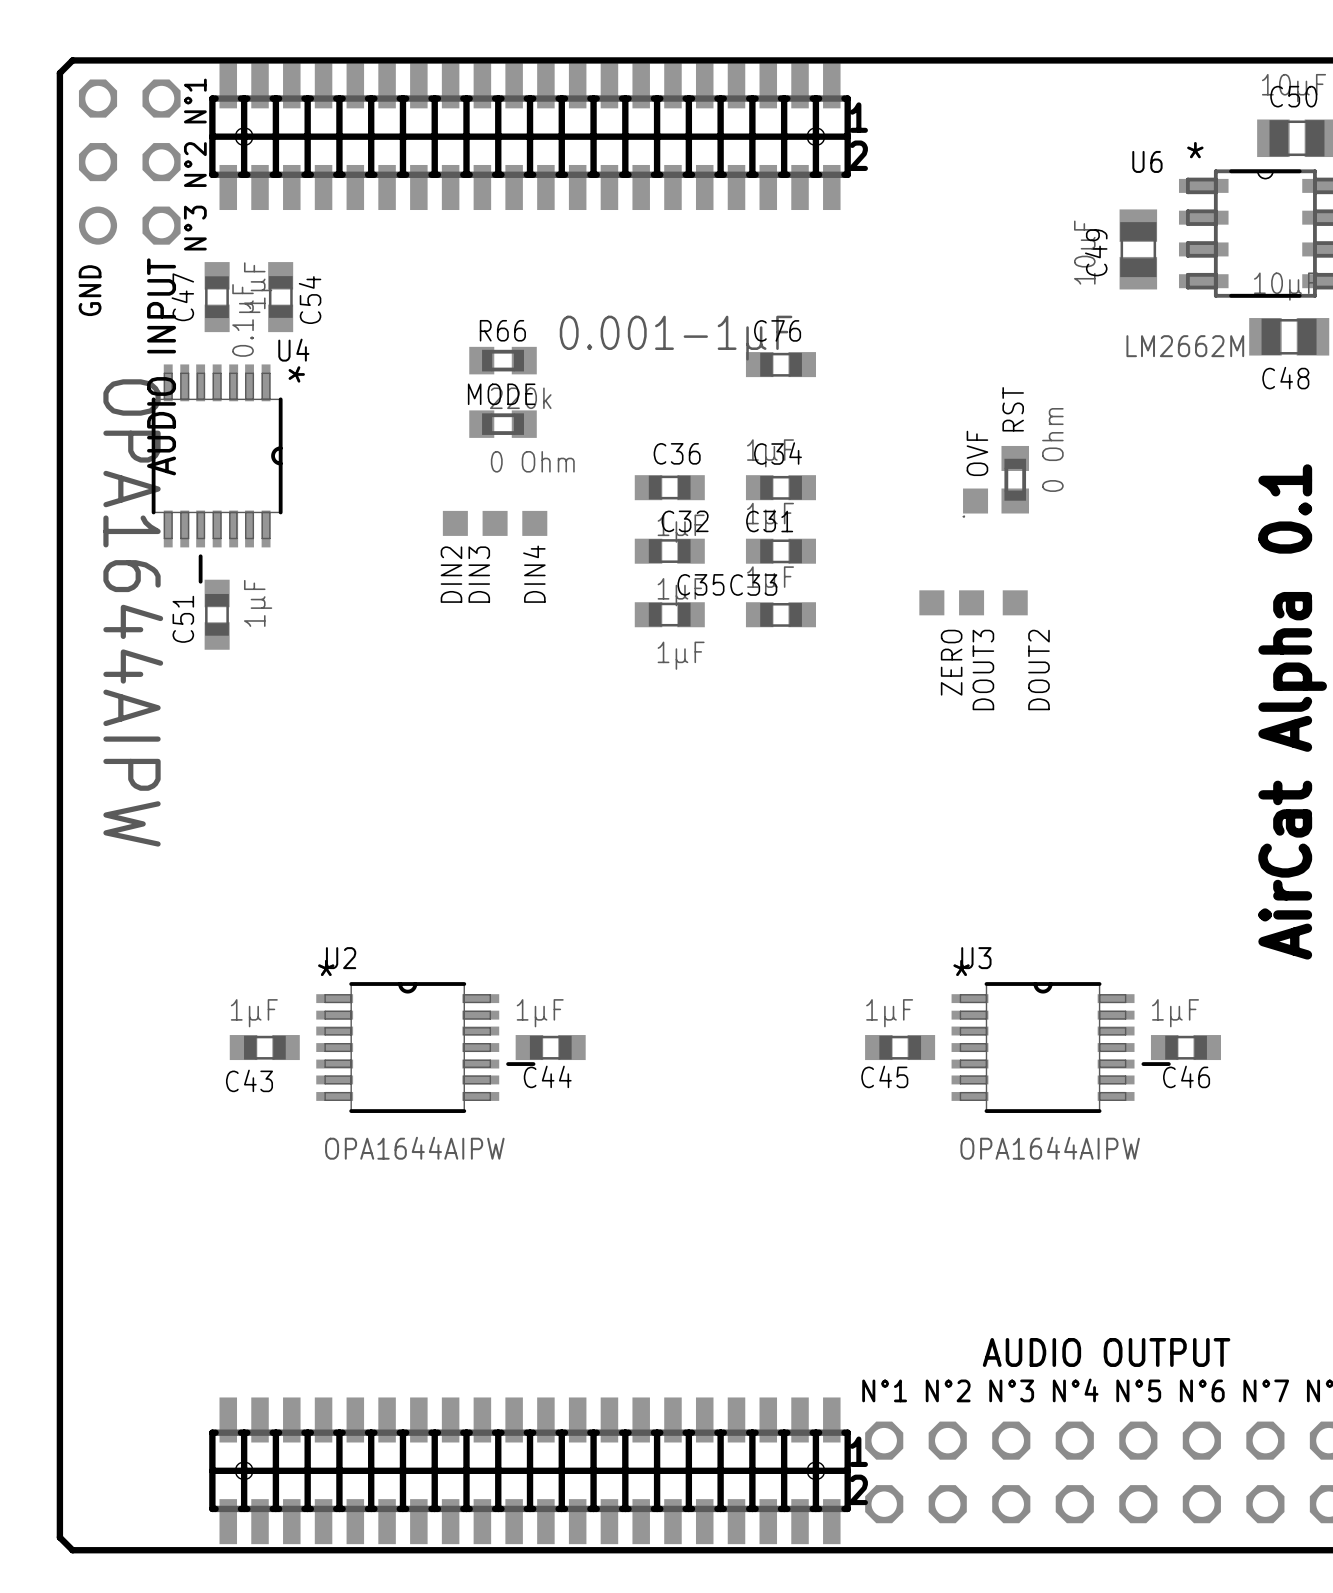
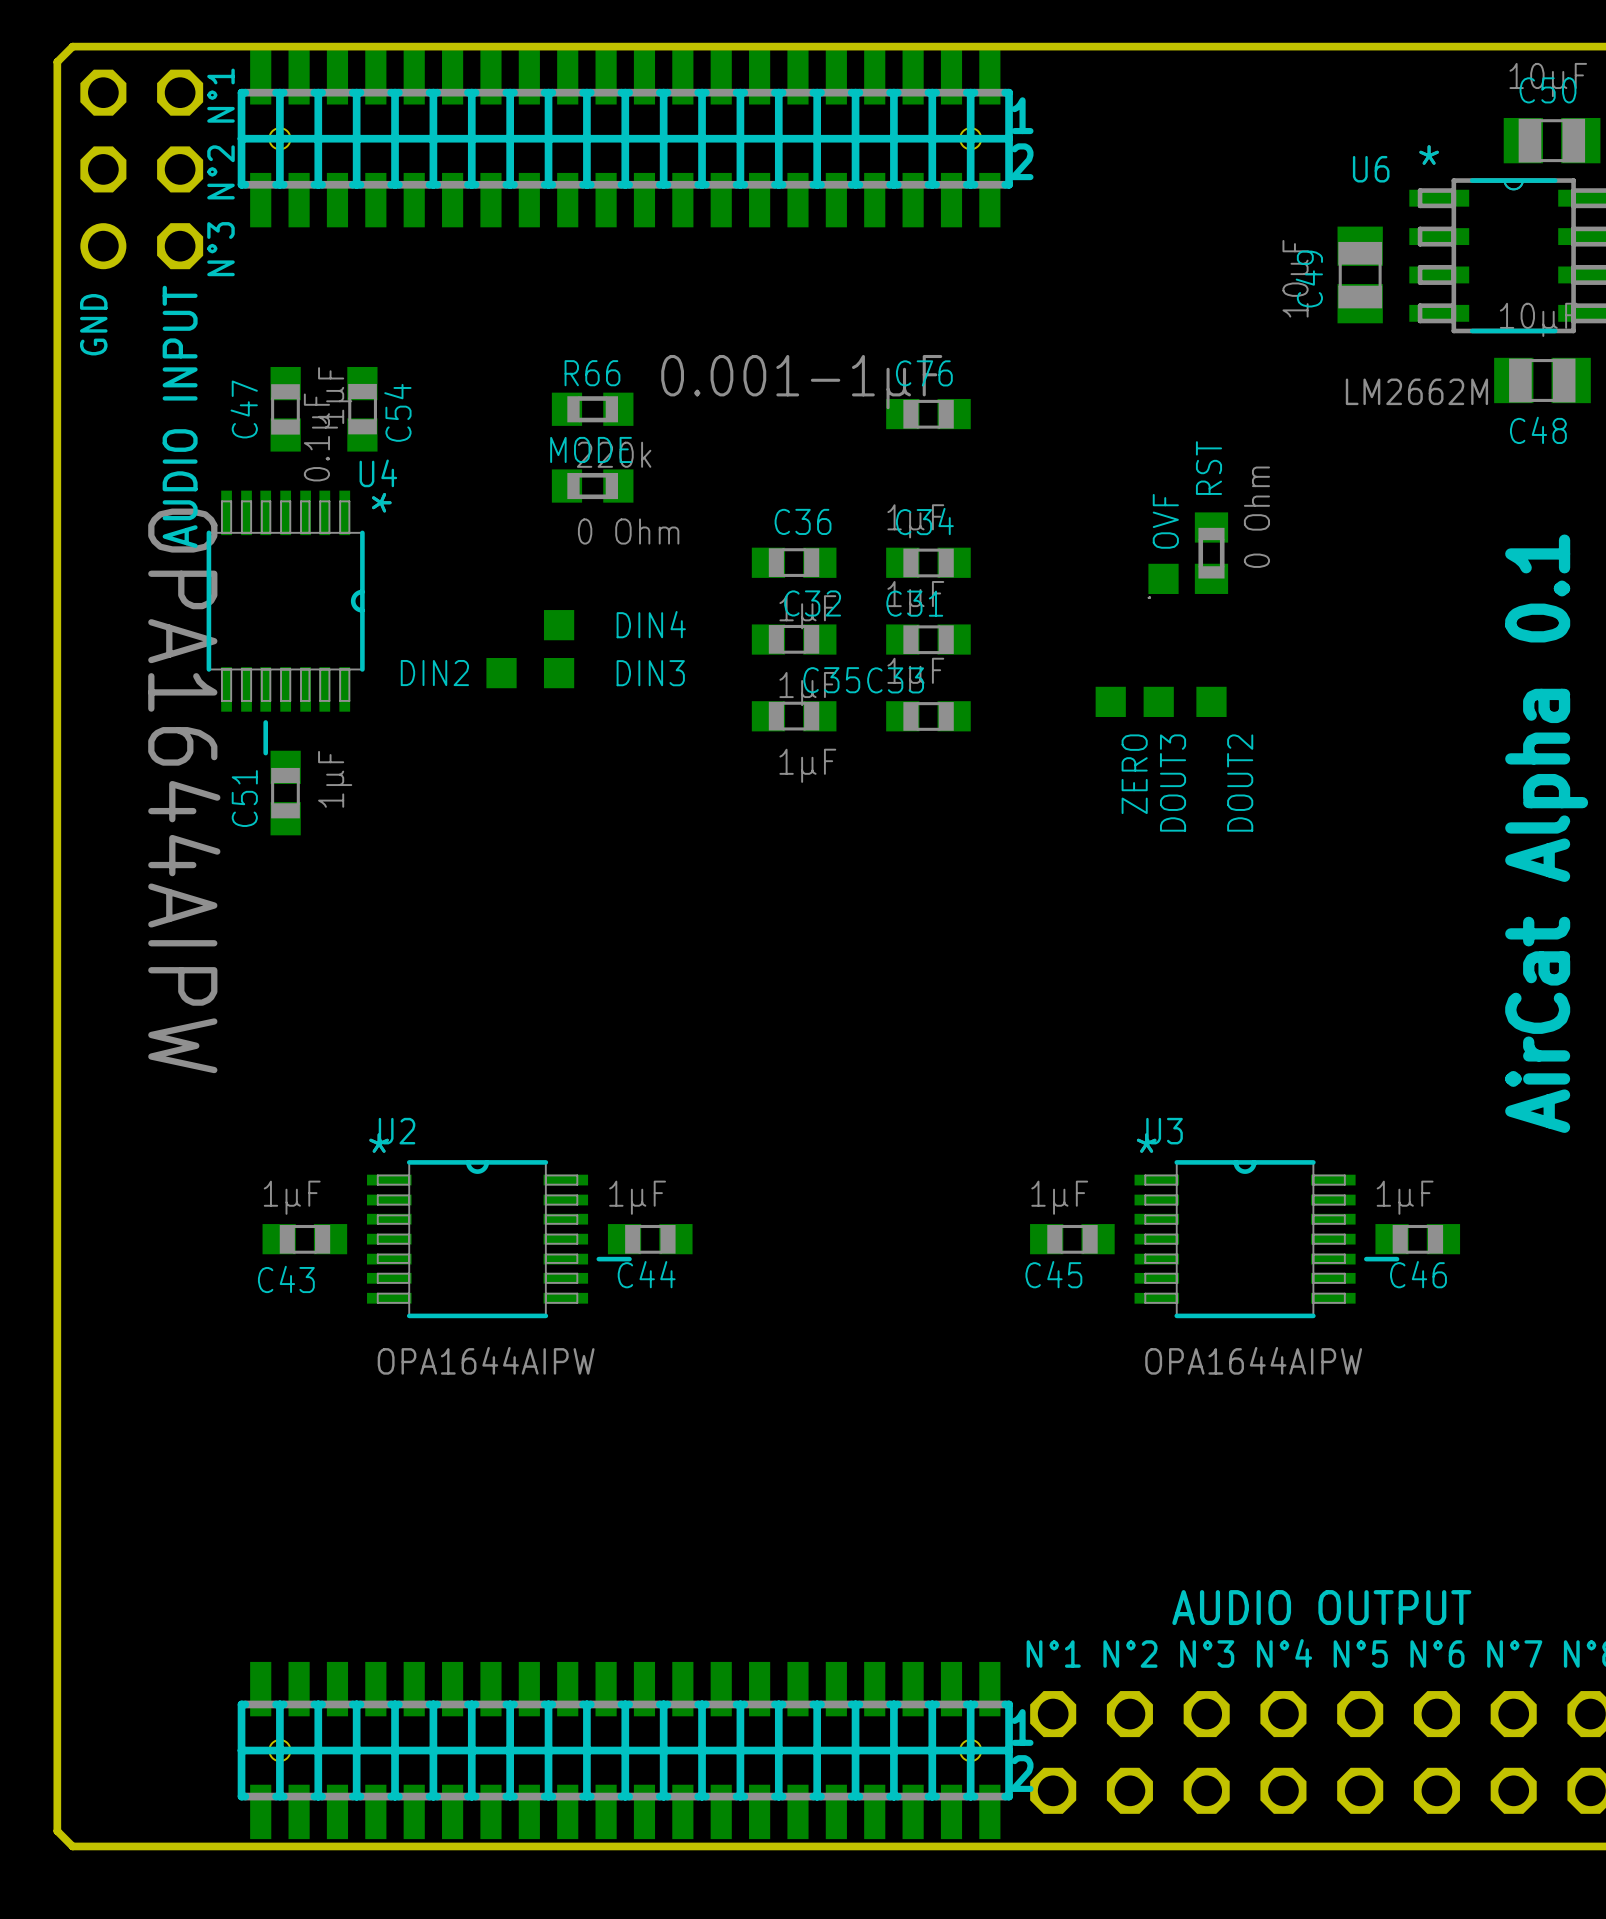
C47 position: (217, 297) -> (285, 409)
C54 position: (280, 297) -> (362, 409)
U4 position: (217, 474) -> (285, 623)
DIN2 position: (455, 523) -> (501, 673)
DIN3 position: (495, 523) -> (559, 673)
DIN4 position: (534, 523) -> (559, 625)
DIN2 name rotation: 0° (451, 574) -> 90° clockwise (434, 673)
DIN3 name rotation: 0° (479, 574) -> 90° clockwise (650, 673)
DIN4 name rotation: 0° (534, 574) -> 90° clockwise (651, 624)
C51 position: (217, 614) -> (285, 793)

